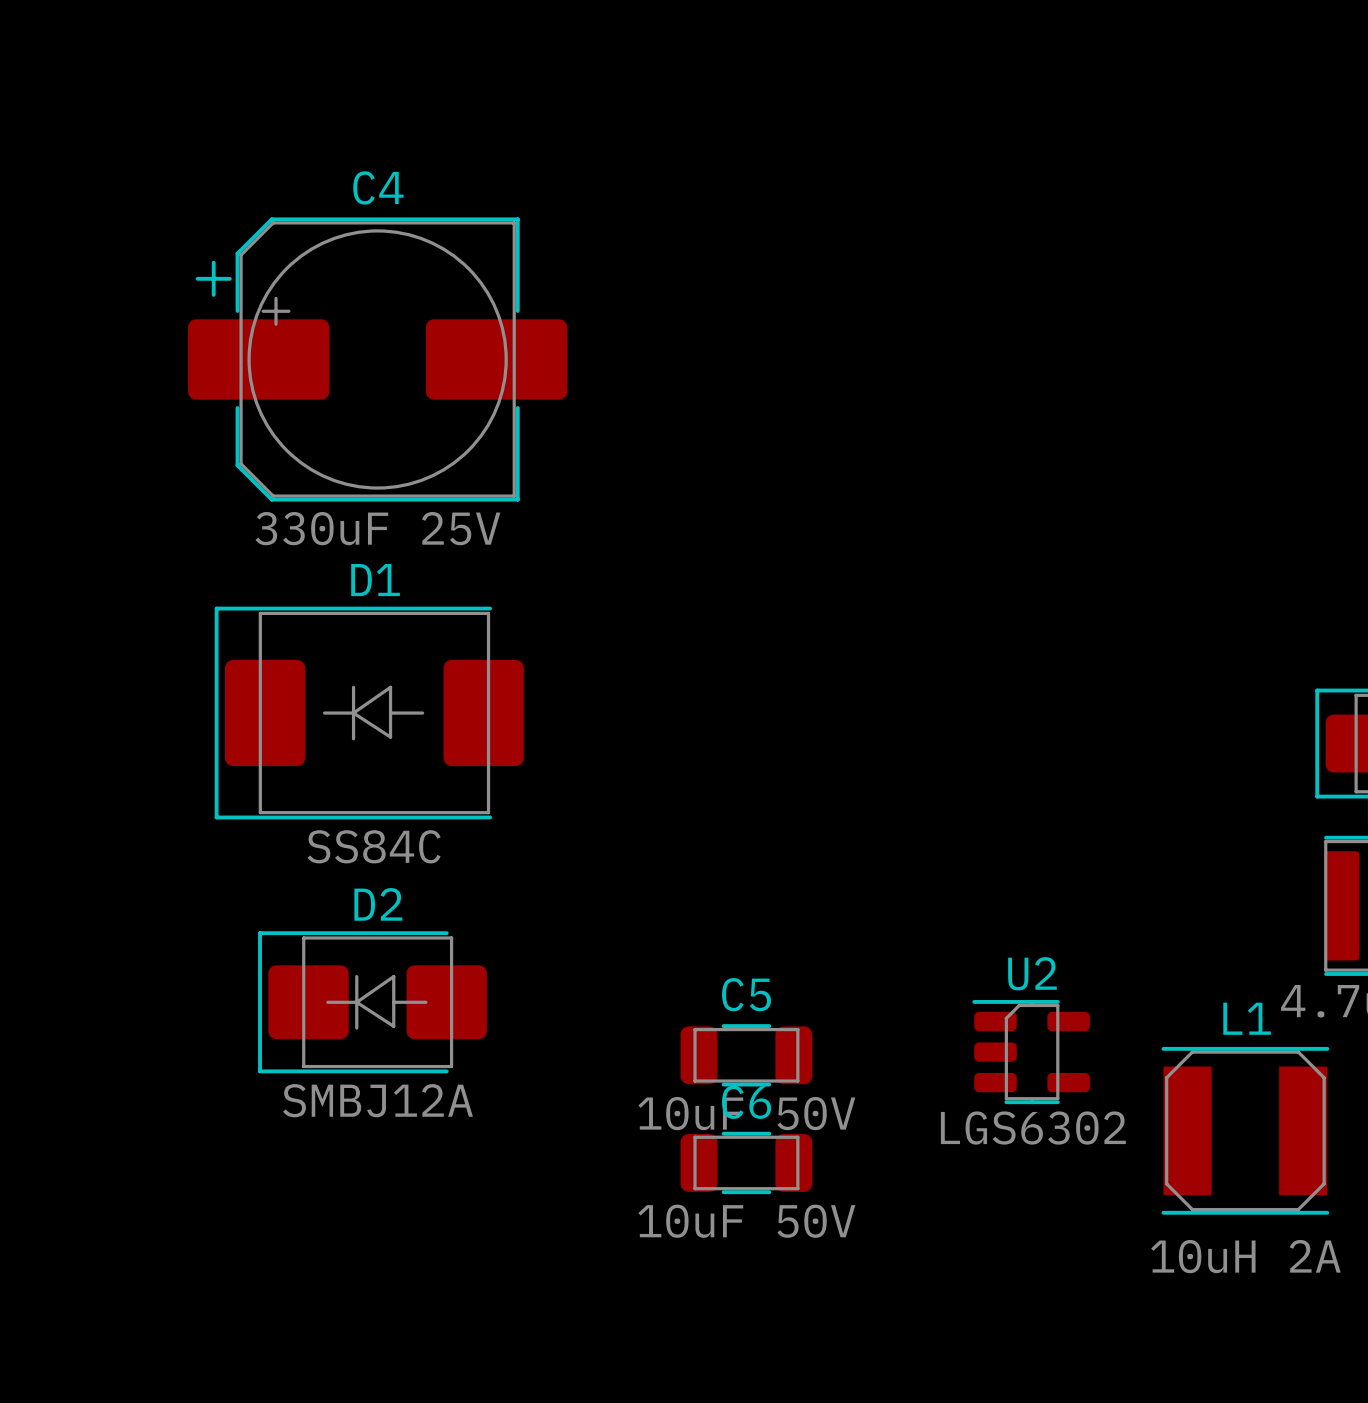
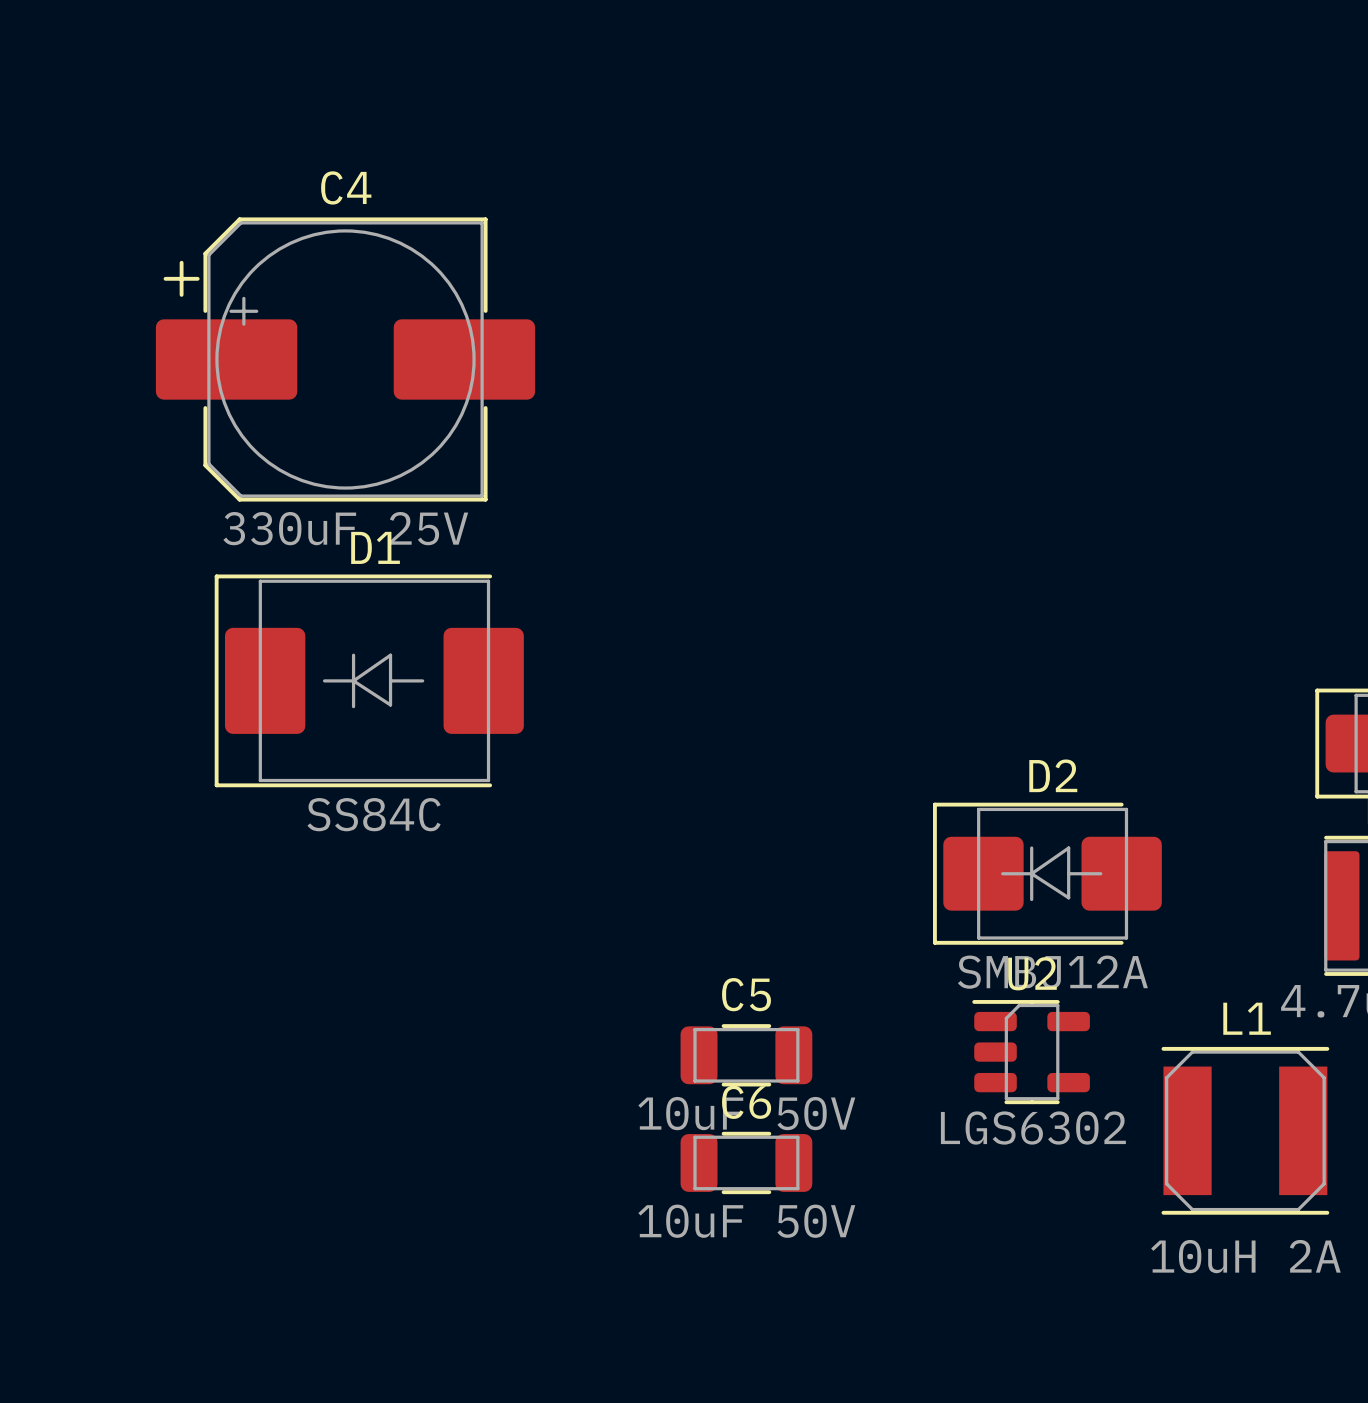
C4 position: (377, 359) -> (345, 359)
D1 position: (369, 713) -> (369, 680)
D2 position: (372, 1002) -> (1047, 873)

